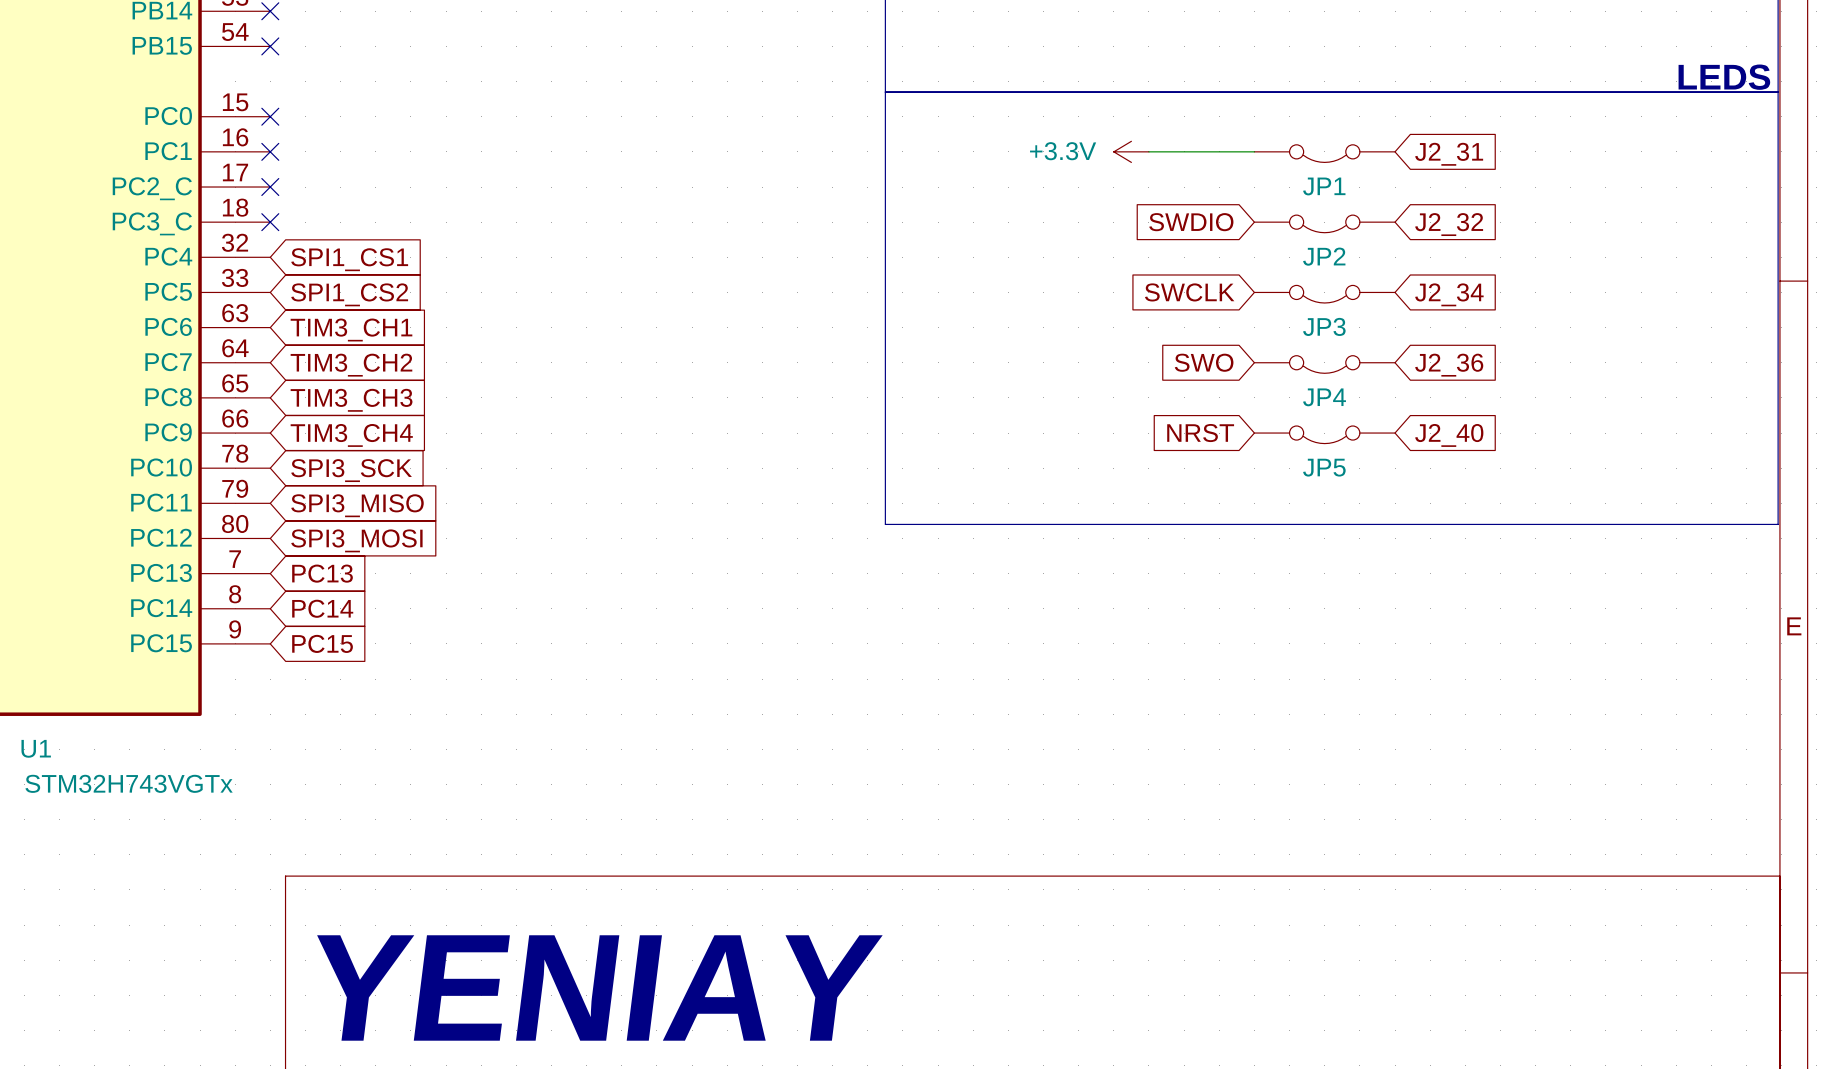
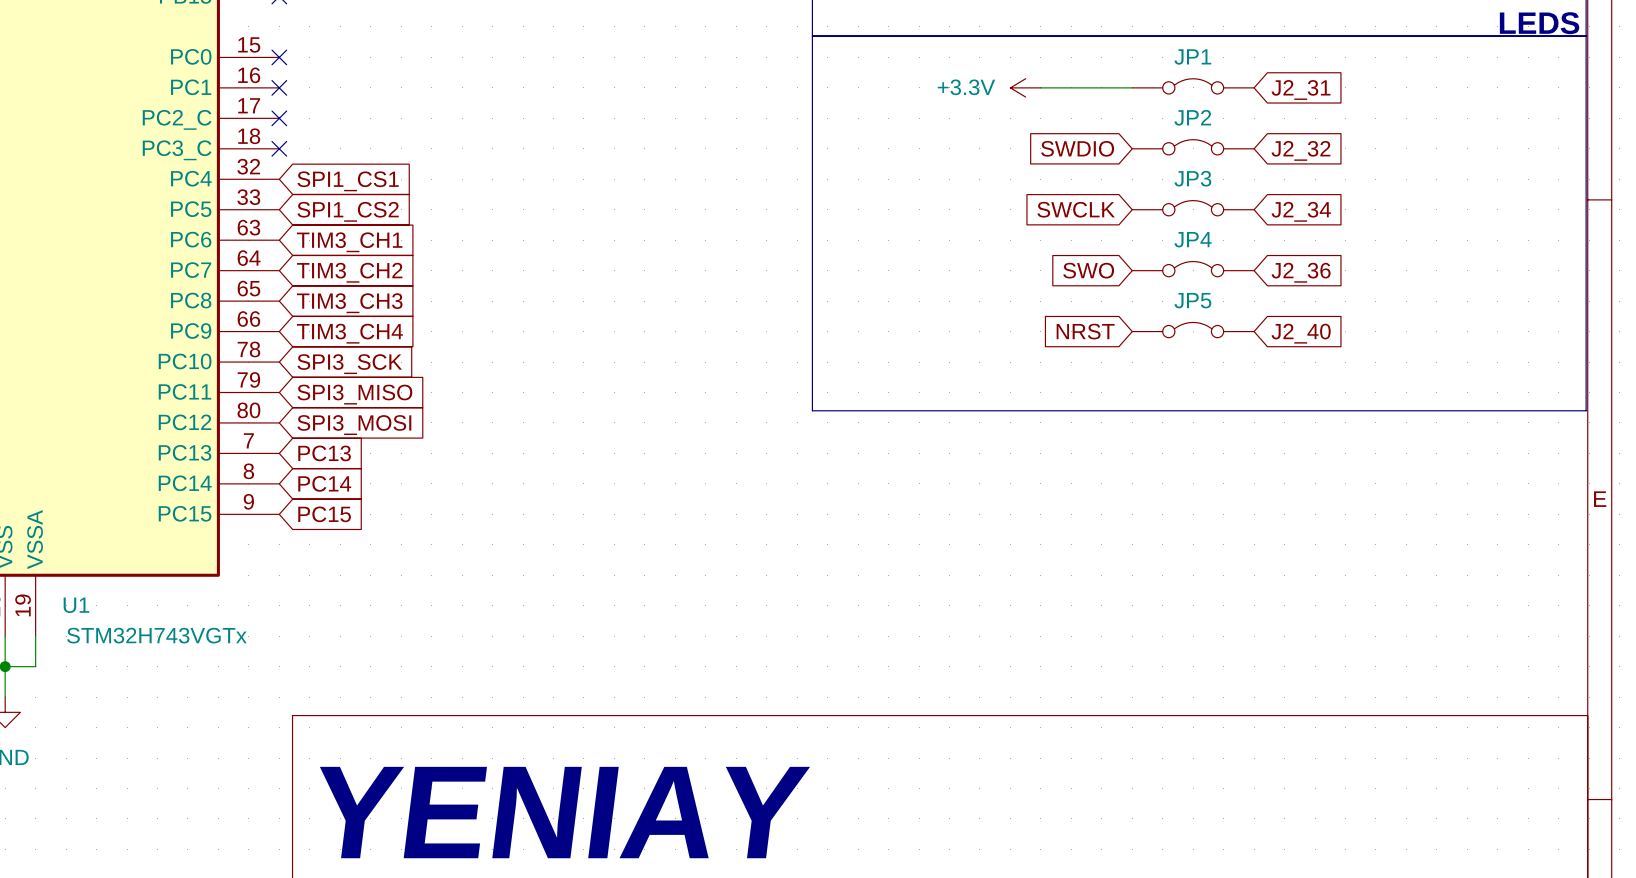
JP1 rotation: 0° (1324, 153) -> 180° (1193, 86)
JP2 rotation: 0° (1324, 223) -> 180° (1193, 147)
JP3 rotation: 0° (1324, 294) -> 180° (1193, 208)
JP4 rotation: 0° (1324, 364) -> 180° (1193, 269)
JP5 rotation: 0° (1324, 434) -> 180° (1193, 330)

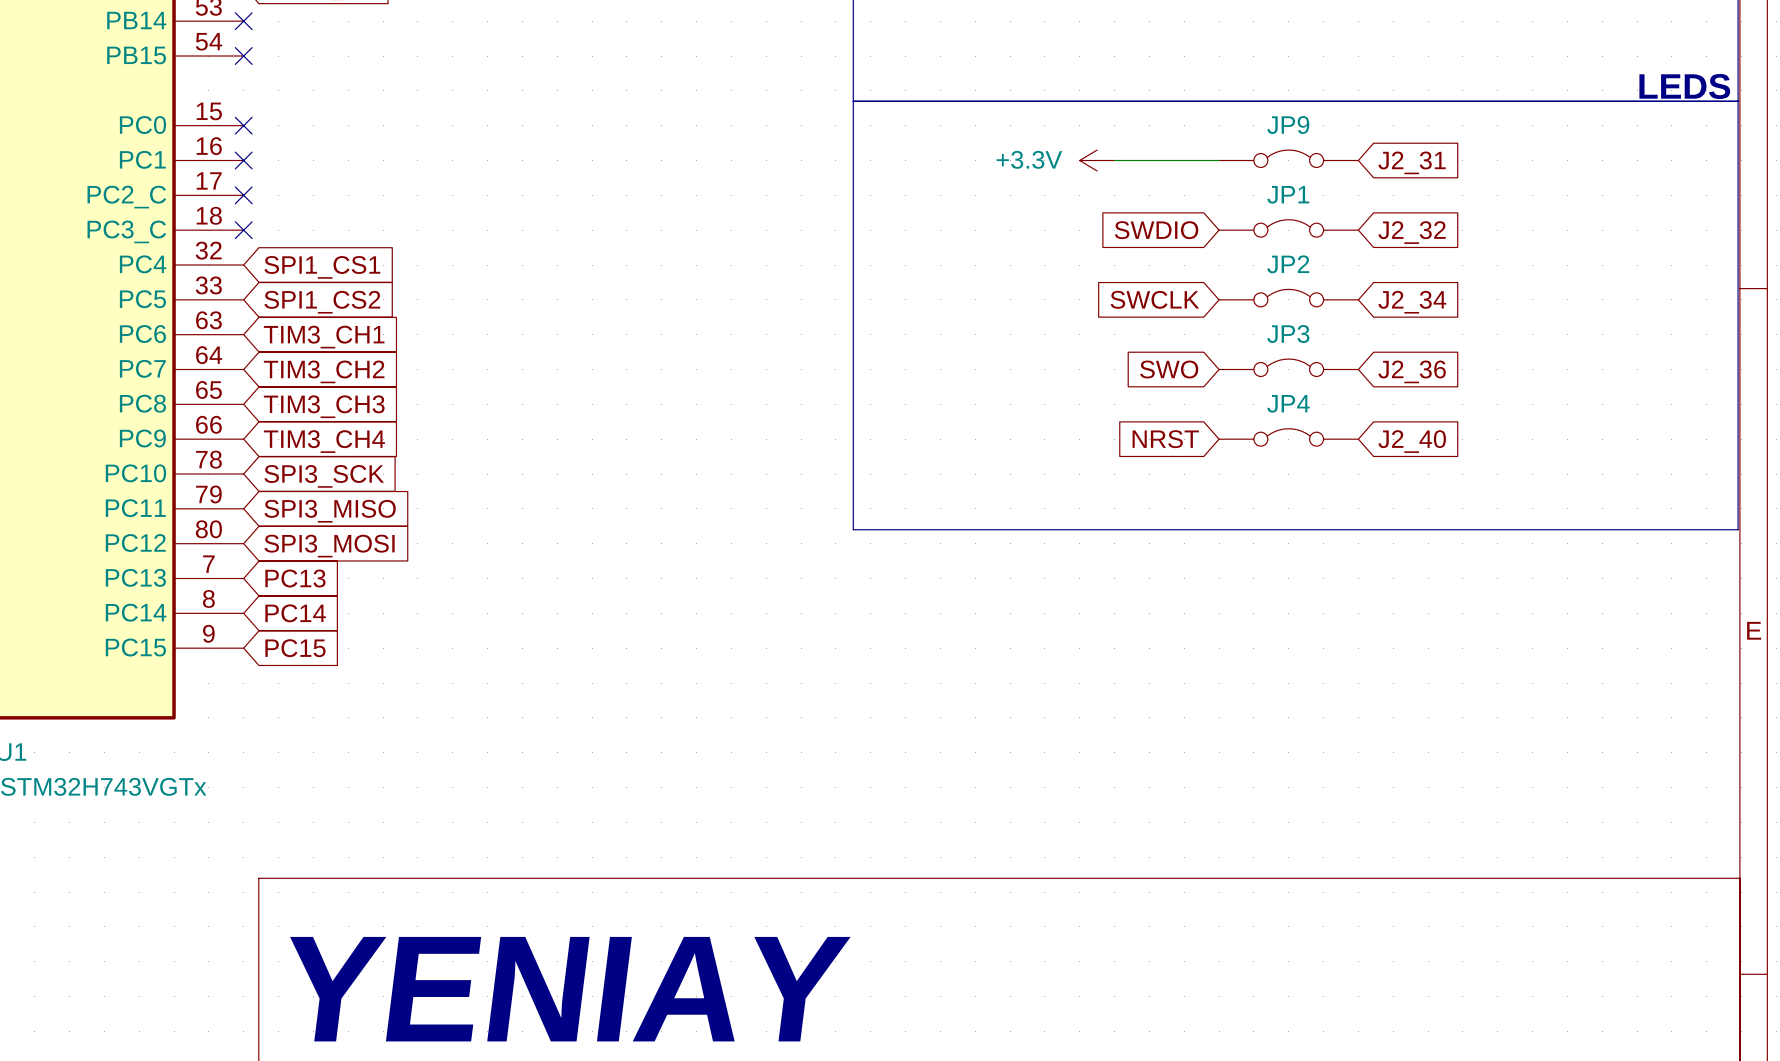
JP1 name: JP1 (1192, 56) -> JP9 (1288, 125)
JP2 name: JP2 (1192, 117) -> JP1 (1288, 194)
JP3 name: JP3 (1192, 178) -> JP2 (1288, 264)
JP4 name: JP4 (1193, 239) -> JP3 (1288, 334)
JP5 name: JP5 (1192, 300) -> JP4 (1288, 403)

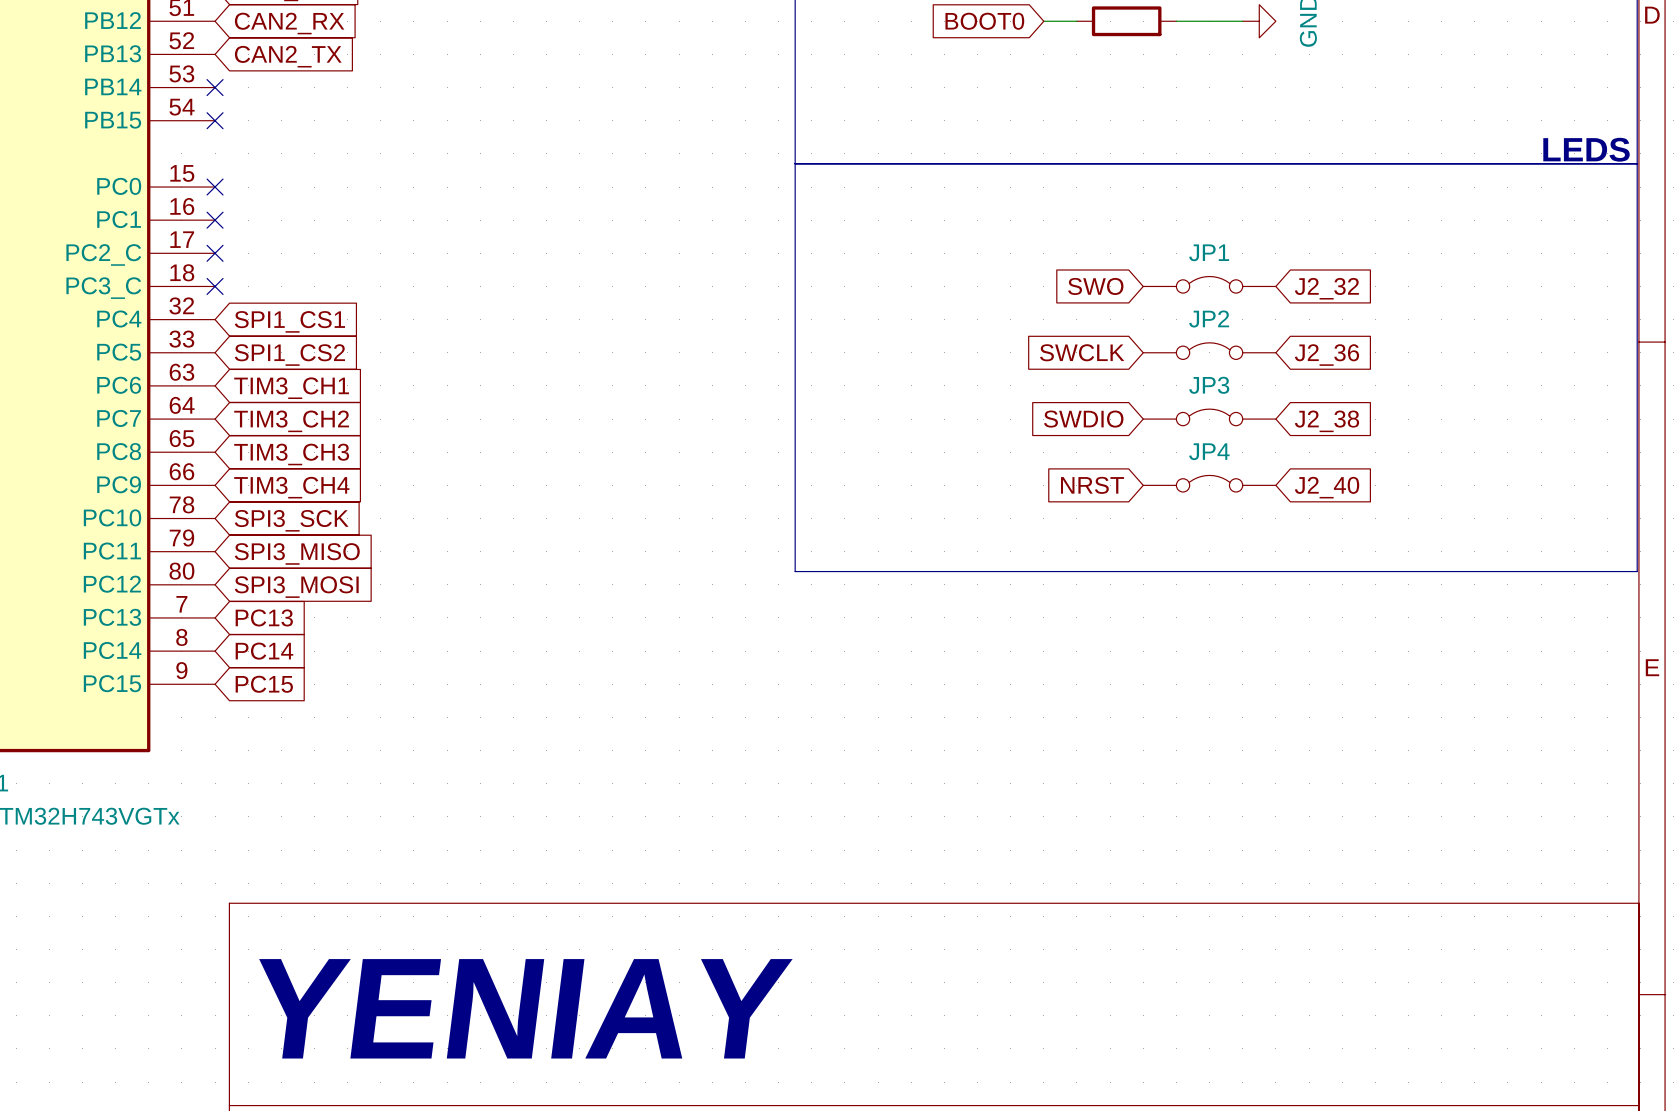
JP9: (1288, 158) -> none
power symbol: +3.3V (1097, 160) -> none
wire: (1114, 160) (1219, 160) -> none
global label: J2_31 (1412, 162) -> none
global label: SWDIO (1156, 230) -> SWO (1095, 286)
global label: J2_34 (1412, 302) -> J2_36 (1326, 355)
global label: SWO (1169, 369) -> SWDIO (1083, 419)
global label: J2_36 (1412, 371) -> J2_38 (1326, 421)

